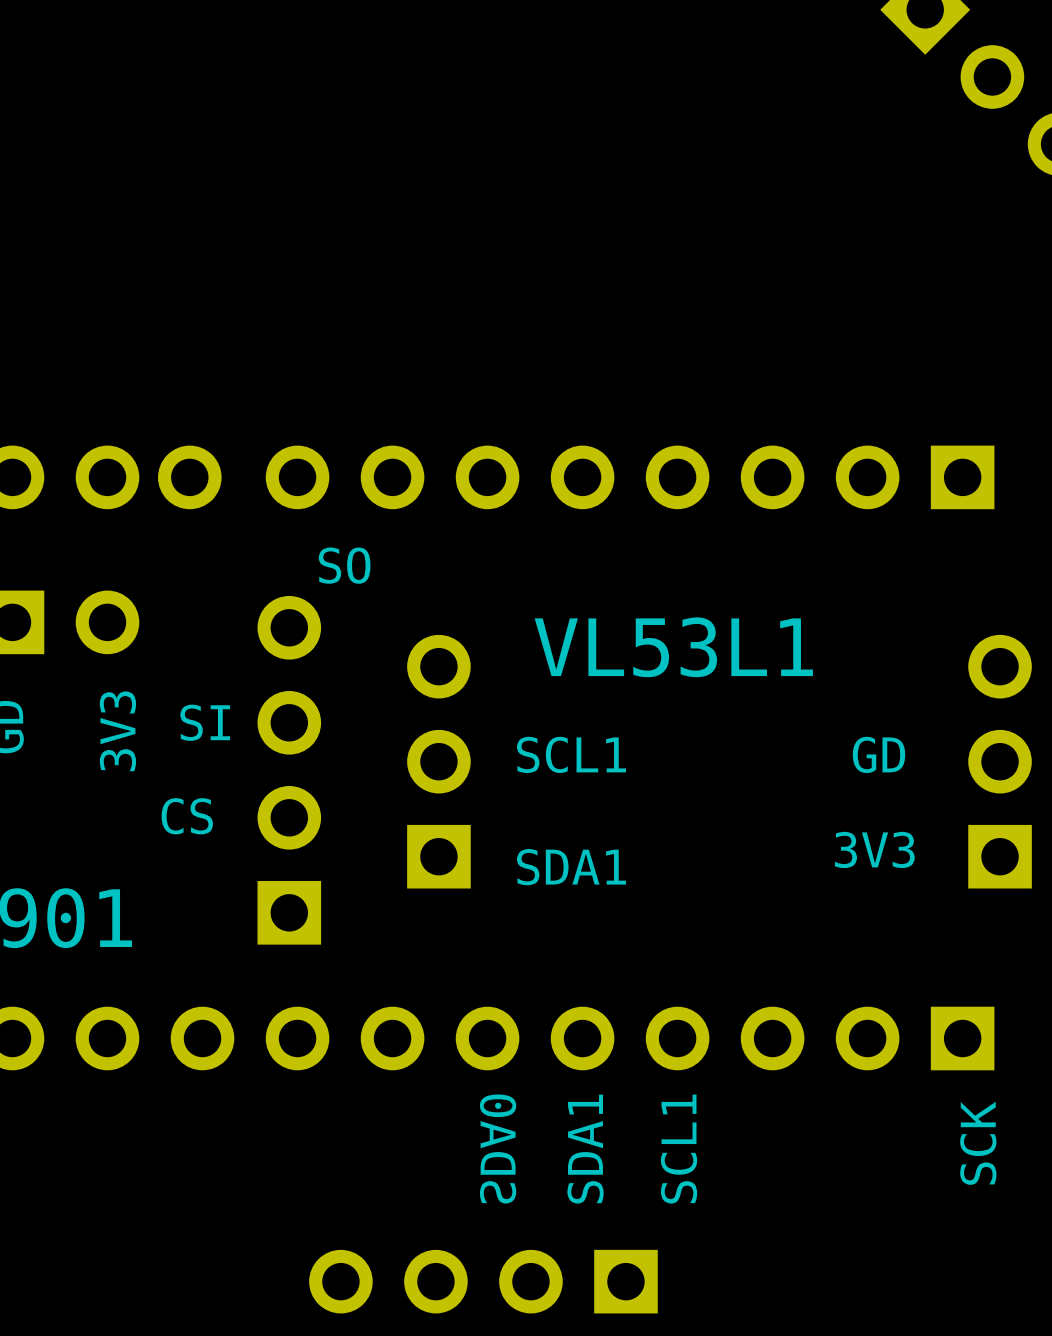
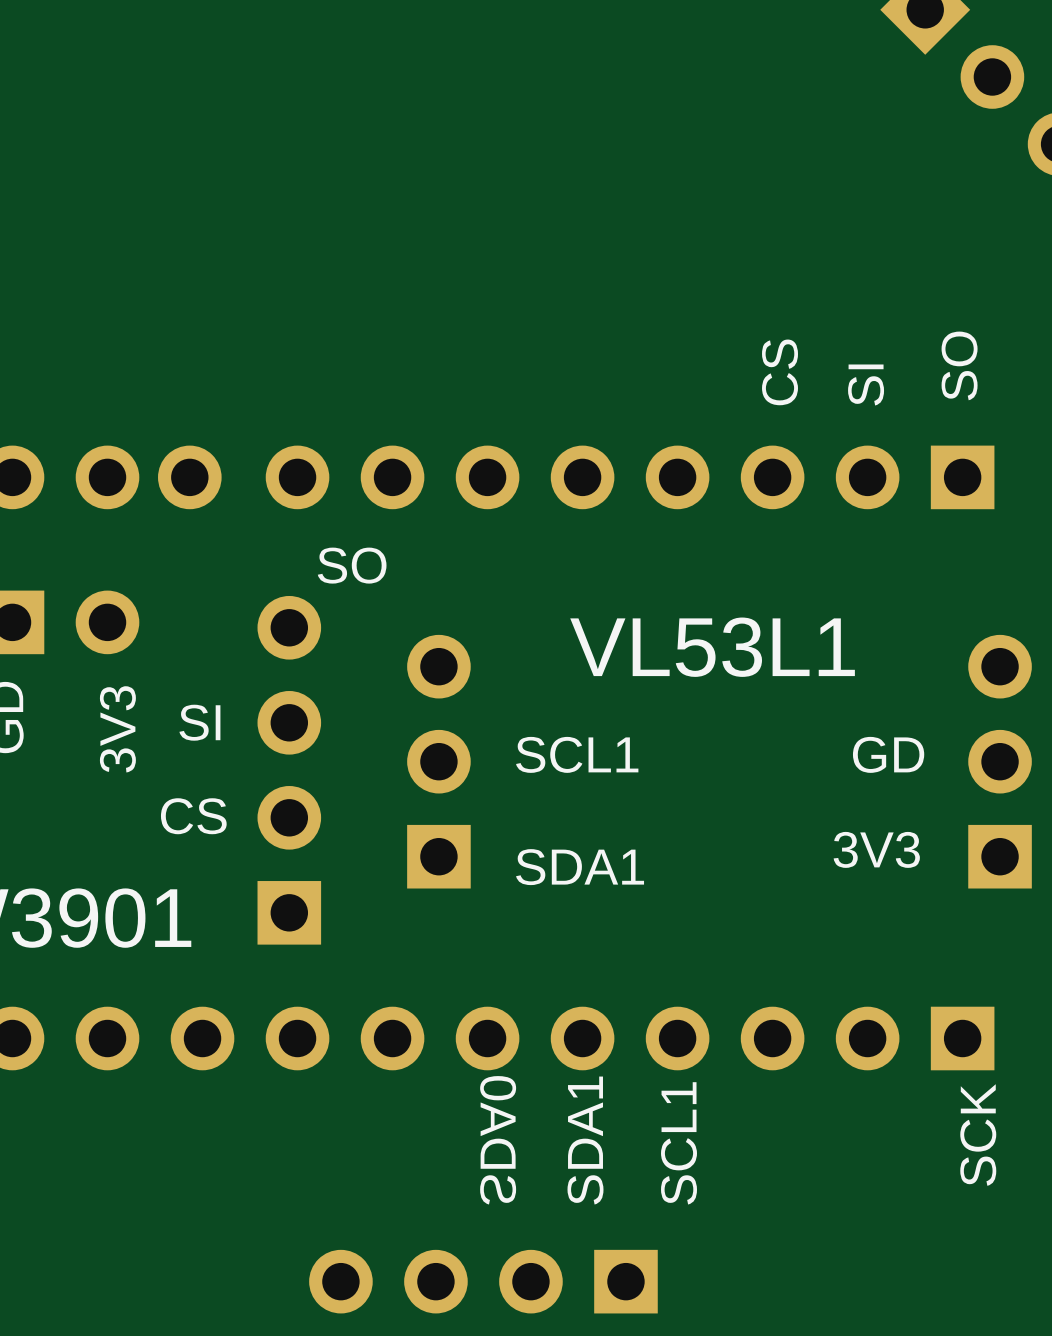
text: none -> SO (959, 365)
text: none -> CS (780, 372)
text: none -> SI (866, 385)
text position: VL53L1 (673, 647) -> VL53L1 (712, 647)

